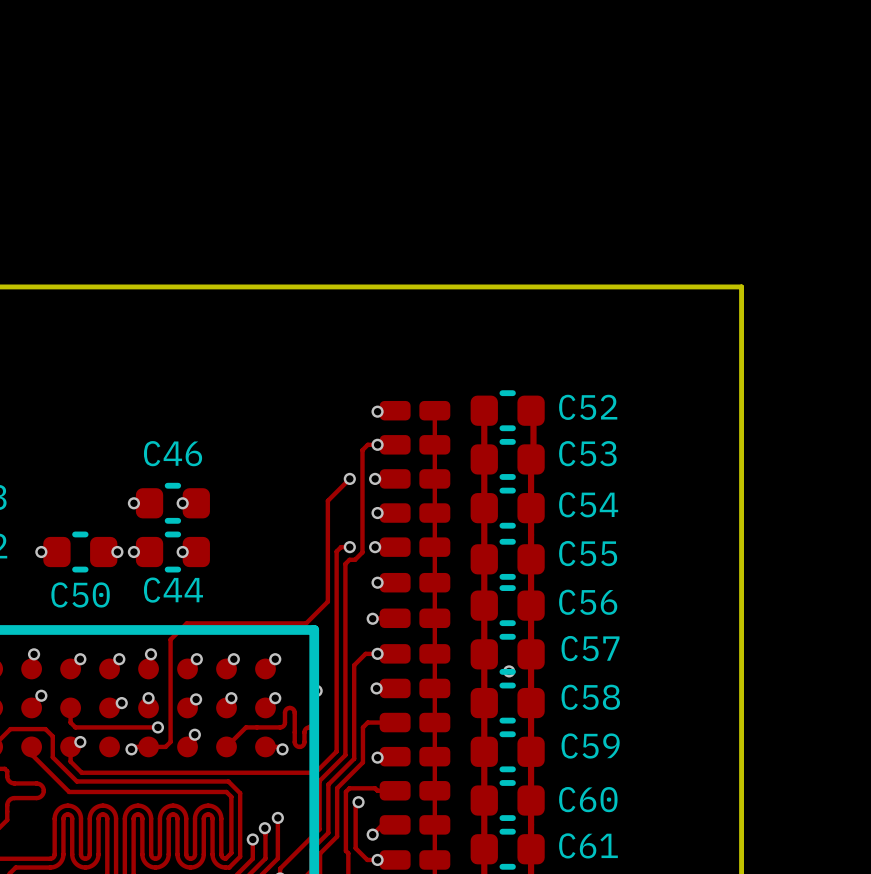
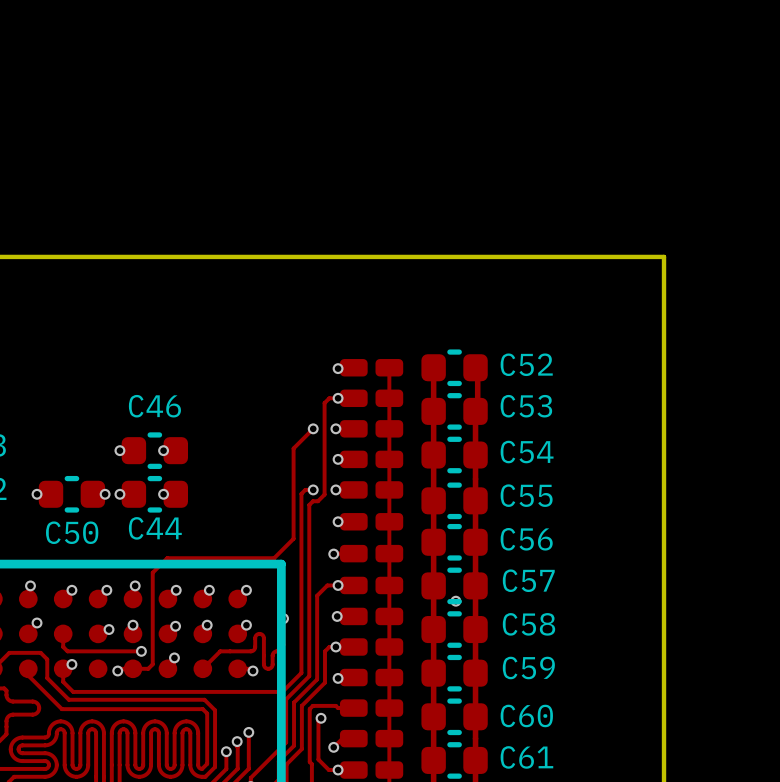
via: none -> (335, 646)
track: (54, 819) (54, 854) -> (48, 733) (45, 737) (18, 738) (13, 741) (10, 749) (13, 756) (18, 760) (45, 761) (48, 765)
track: (63, 819) (63, 854) -> (56, 733) (54, 740) (48, 744) (22, 745) (18, 749) (22, 753) (48, 753) (55, 758) (56, 765)

